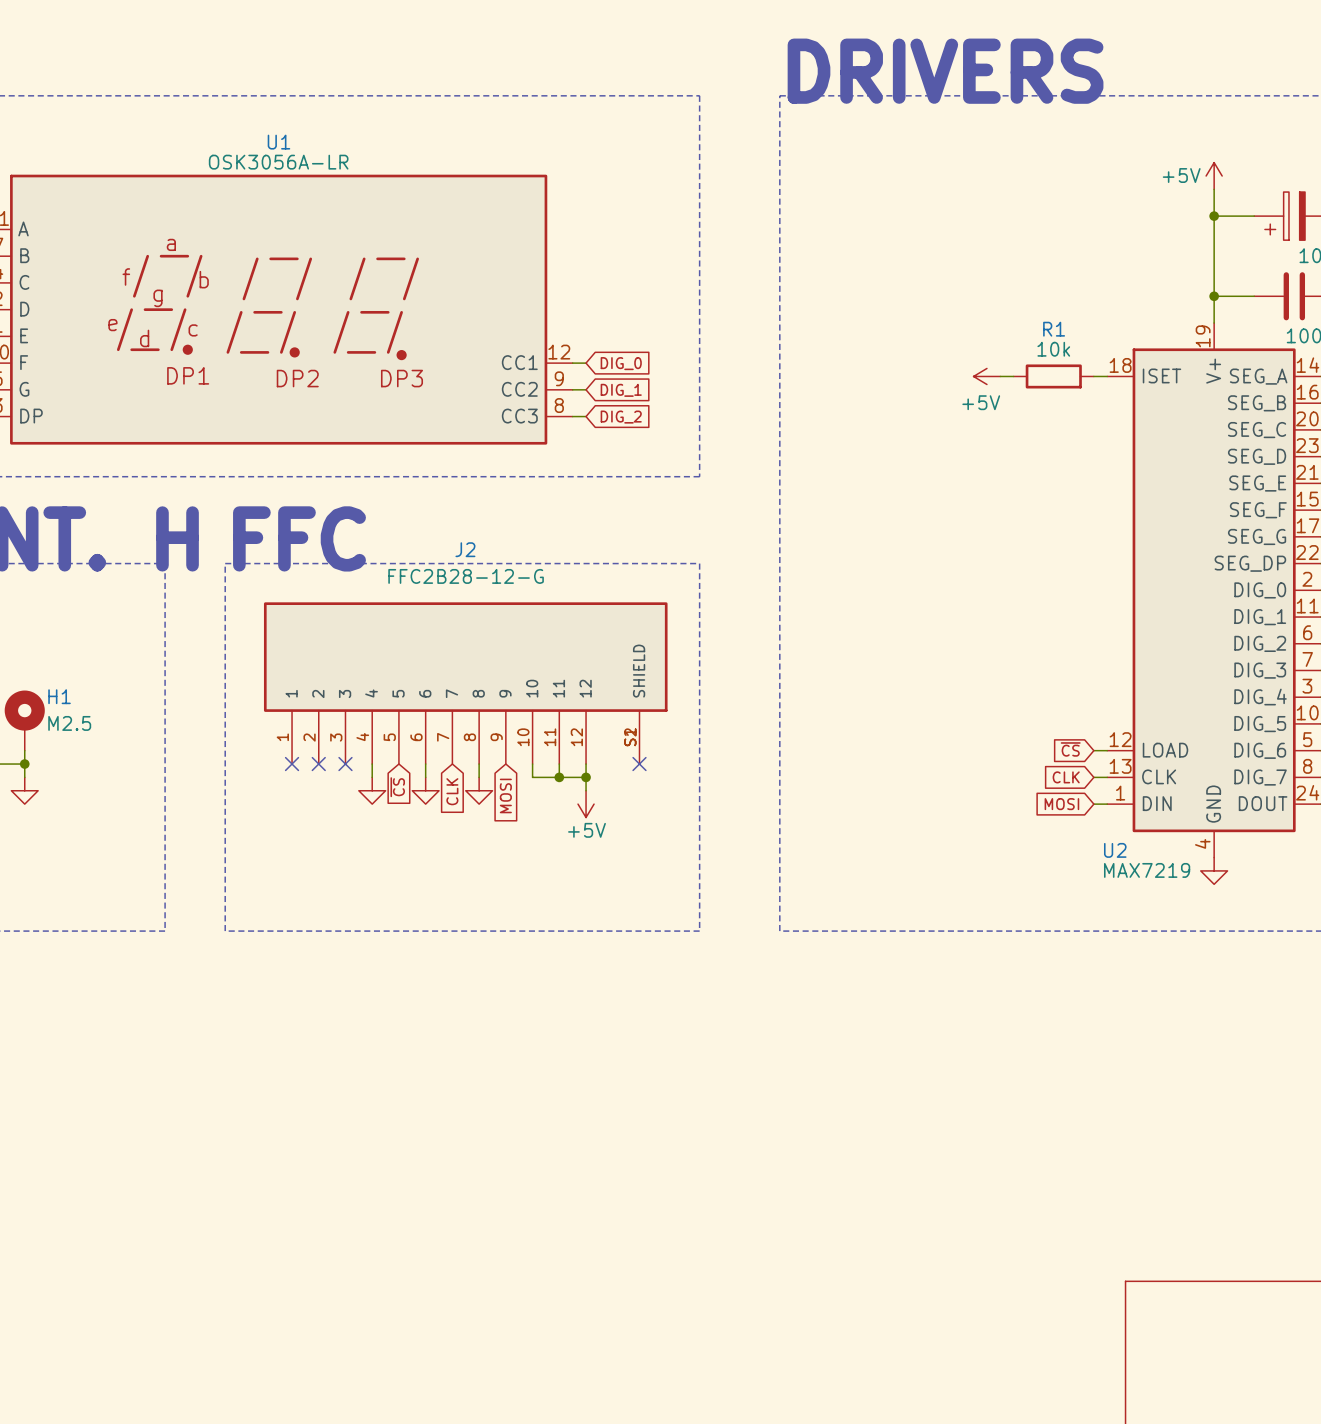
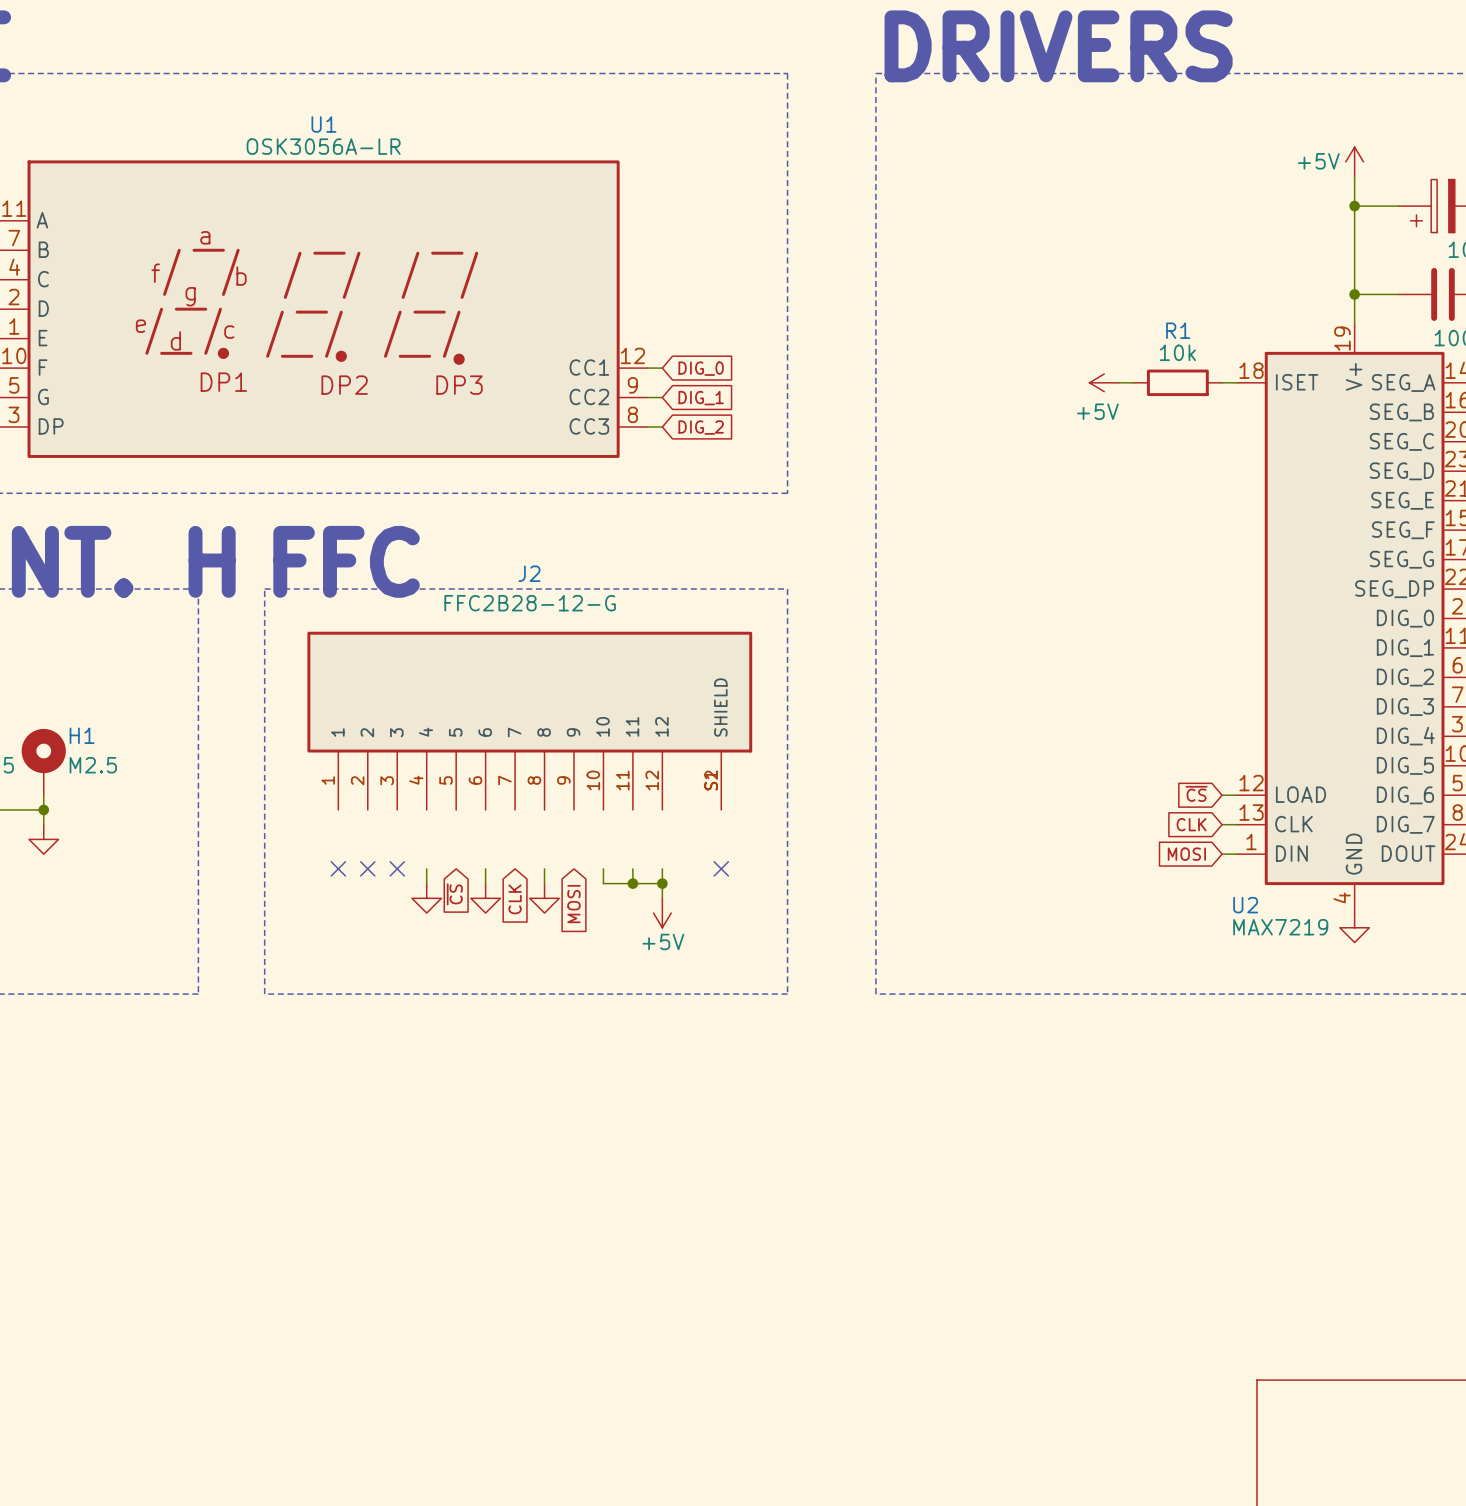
no-connect mark: (292, 764) -> none
no-connect mark: (318, 764) -> none
no-connect mark: (345, 764) -> none
wire: (372, 764) (372, 777) -> (426, 868) (426, 883)
wire: (425, 764) (425, 777) -> (485, 868) (485, 883)
wire: (479, 764) (479, 777) -> (544, 868) (544, 883)
wire: (532, 764) (532, 777) (586, 777) -> (603, 868) (603, 883) (662, 883)
wire: (559, 764) (559, 777) -> (632, 868) (632, 883)
wire: (586, 764) (586, 790) -> (662, 868) (662, 898)
no-connect mark position: (639, 764) -> (721, 868)
junction: (559, 777) -> none
junction: (586, 777) -> none
global label position: ~{CS} (397, 787) -> ~{CS} (454, 894)
power symbol: (372, 790) -> none
power symbol: (425, 790) -> none
power symbol: (479, 790) -> none
global label position: CLK (452, 791) -> CLK (515, 899)
global label position: MOSI (505, 795) -> MOSI (573, 904)
power symbol position: +5V (586, 804) -> +5V (662, 913)
no-connect mark: none -> (338, 868)
no-connect mark: none -> (367, 868)
no-connect mark: none -> (397, 868)
junction: none -> (632, 883)
junction: none -> (662, 883)
power symbol: none -> (426, 898)
power symbol: none -> (485, 898)
power symbol: none -> (544, 898)

